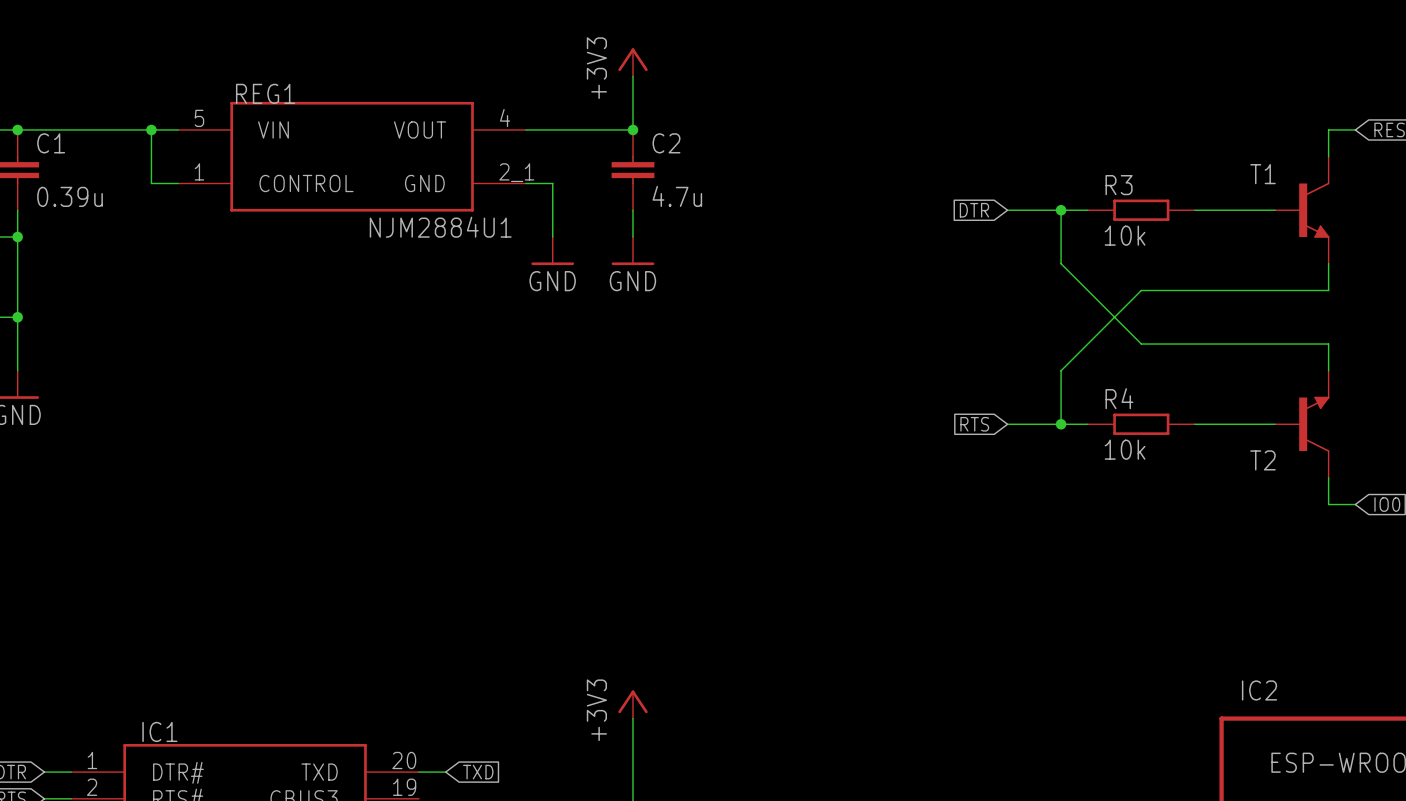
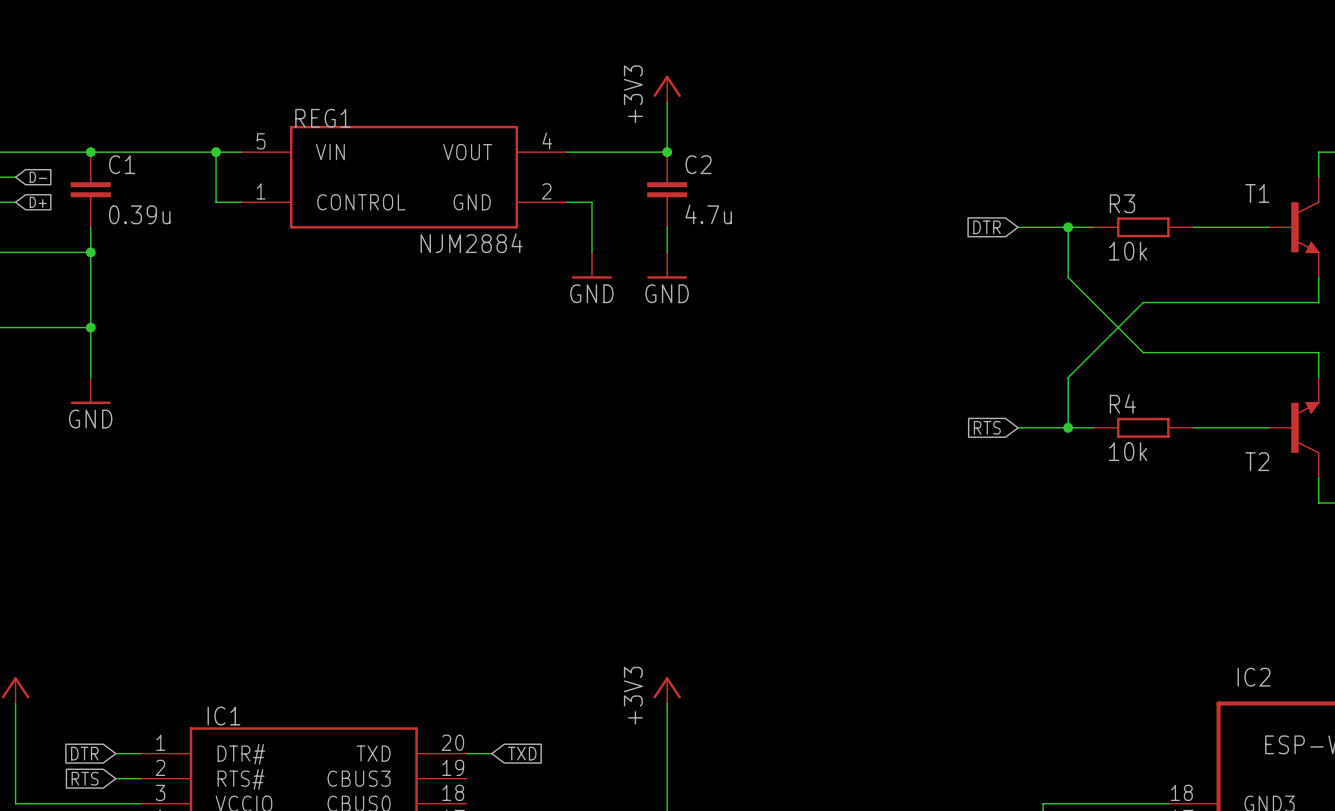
REG1 pin number: 2_1 (516, 172) -> 2 (546, 191)
REG1 value: NJM2884U1 (440, 227) -> NJM2884 (471, 243)

